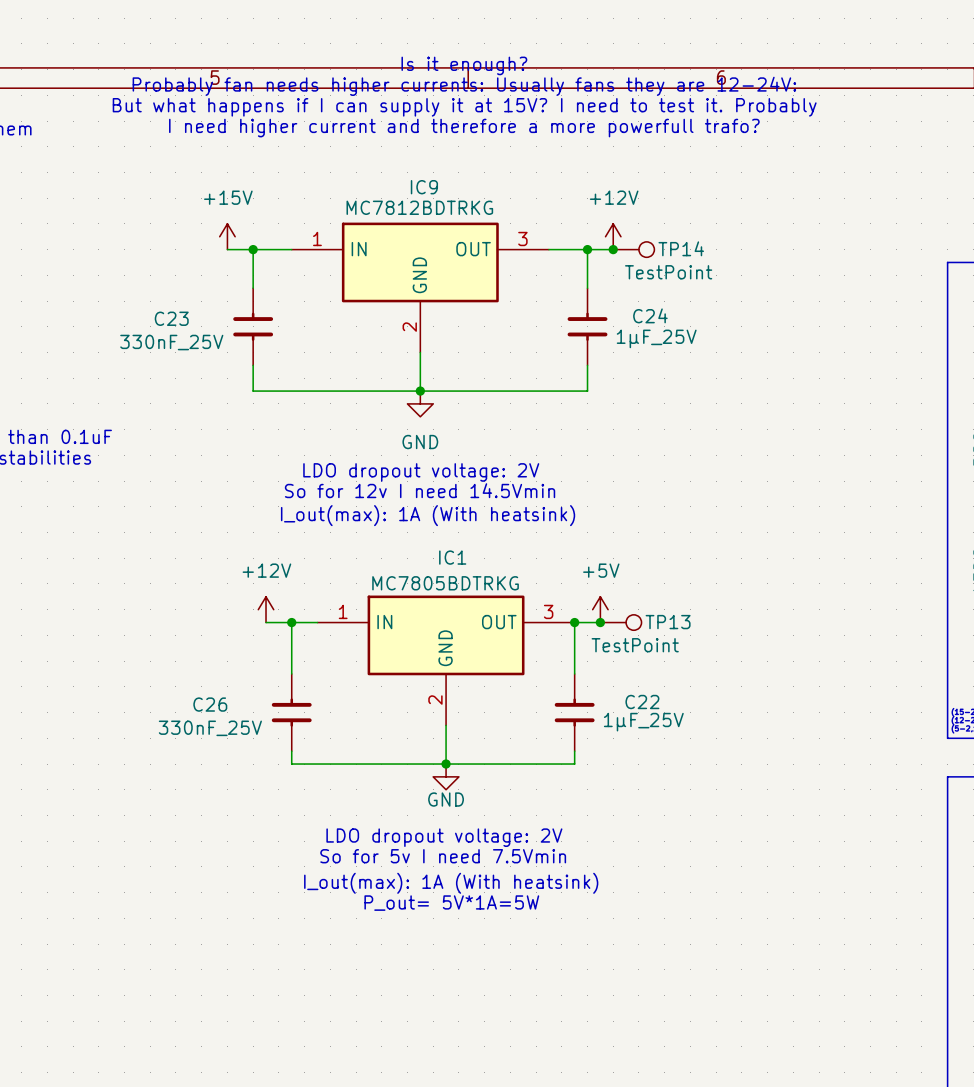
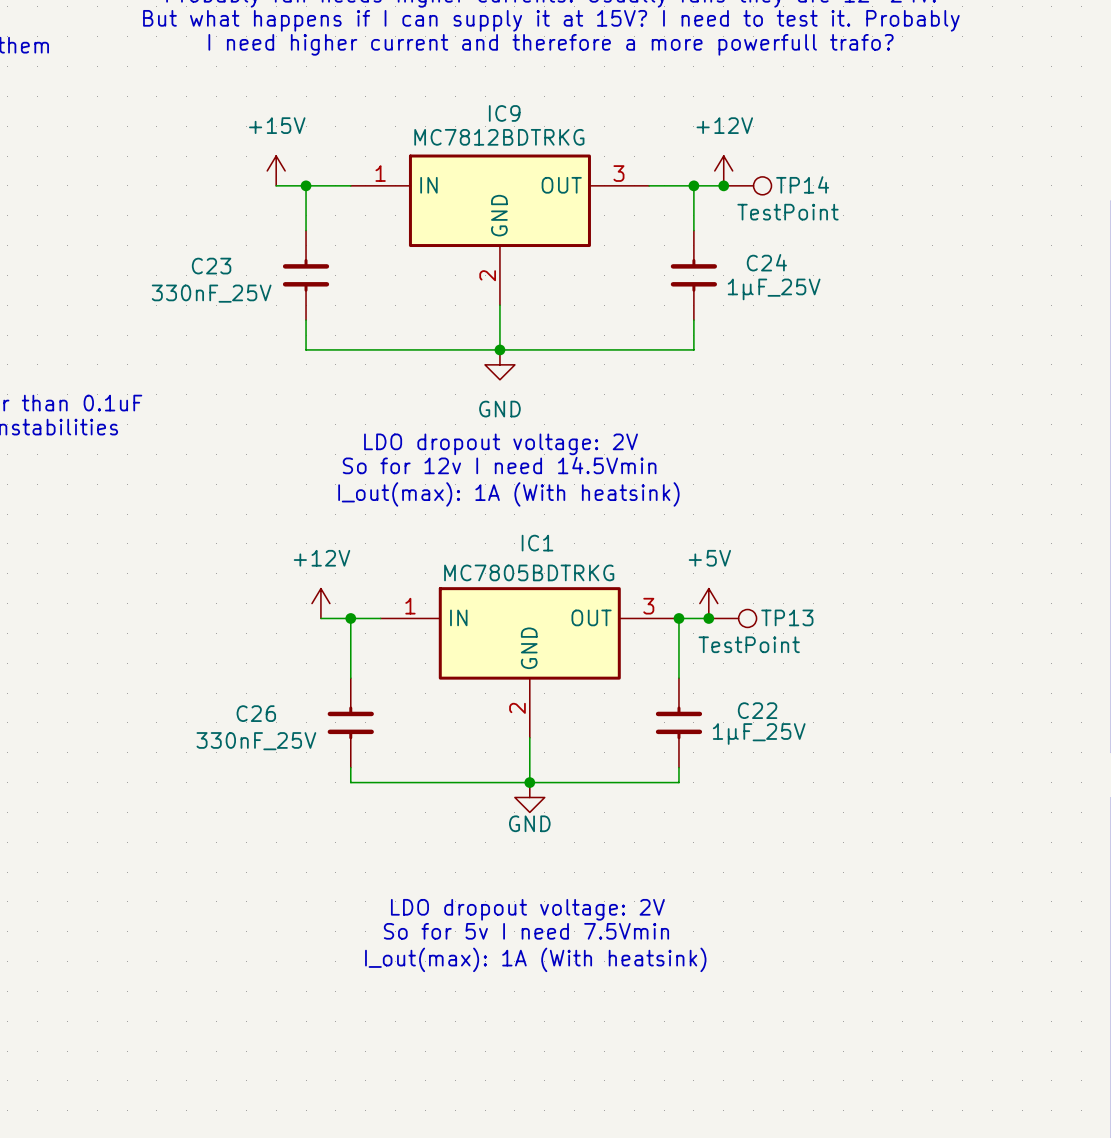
text position: LDO dropout voltage: 2V (444, 837) -> LDO dropout voltage: 2V (527, 909)
text position: So for 5v I need 7.5Vmin (443, 856) -> So for 5v I need 7.5Vmin (526, 931)
text position: I_out(max): 1A (With heatsink) (451, 883) -> I_out(max): 1A (With heatsink) (535, 959)
text: P_out= 5V*1A=5W (451, 903) -> none

